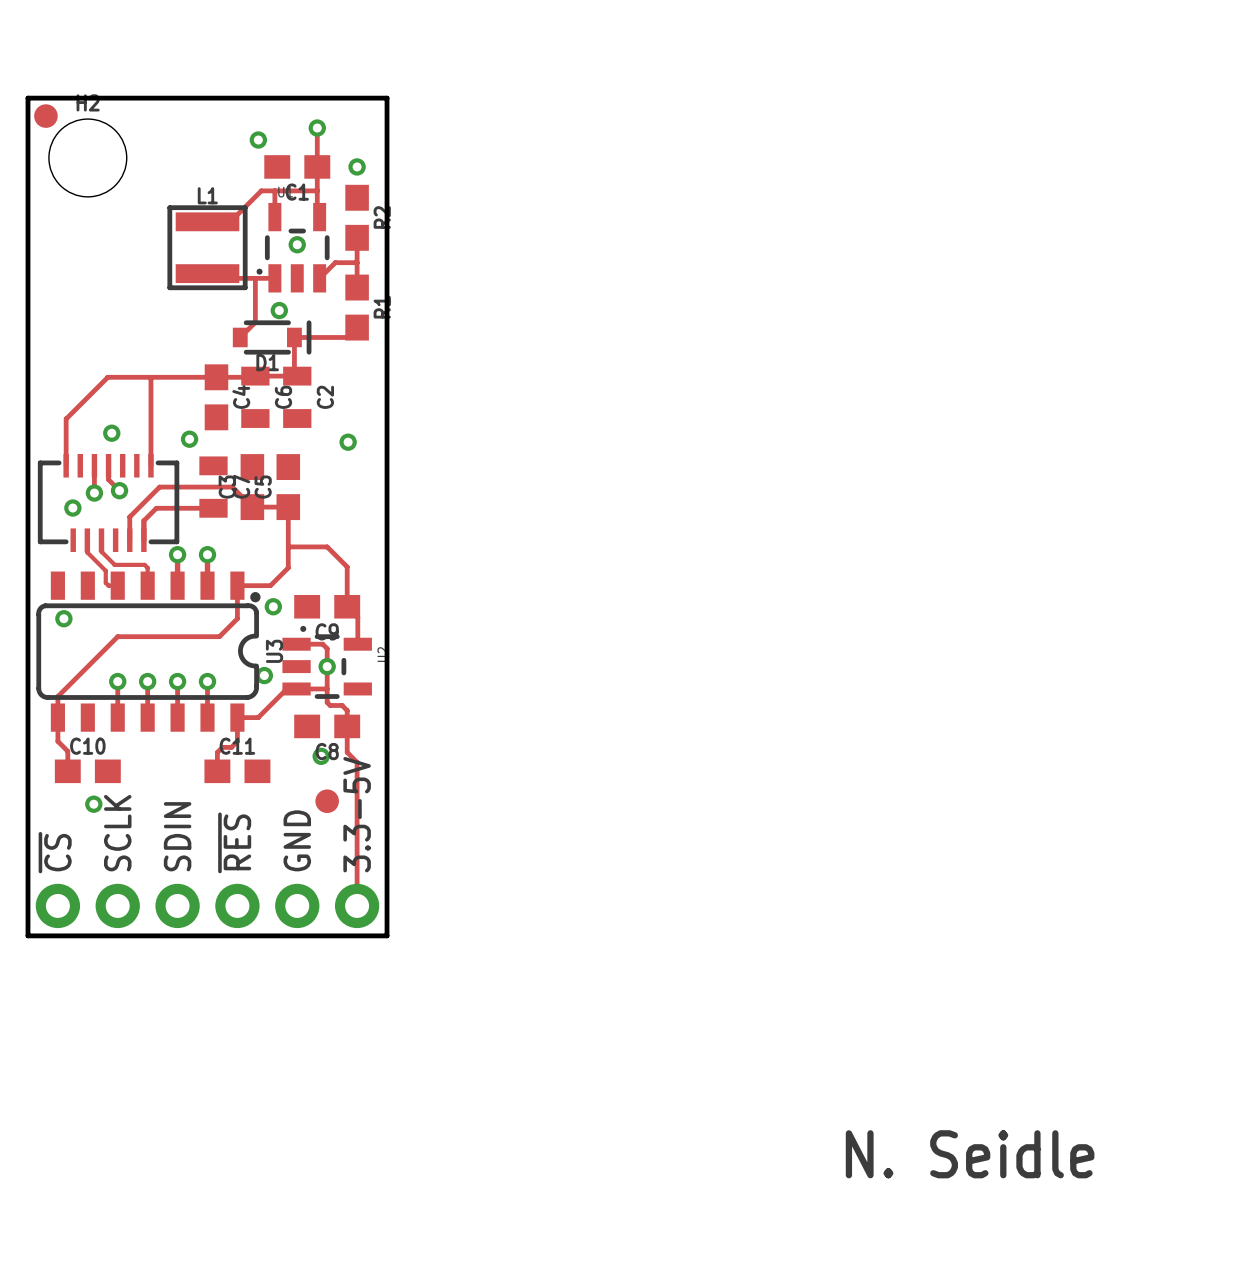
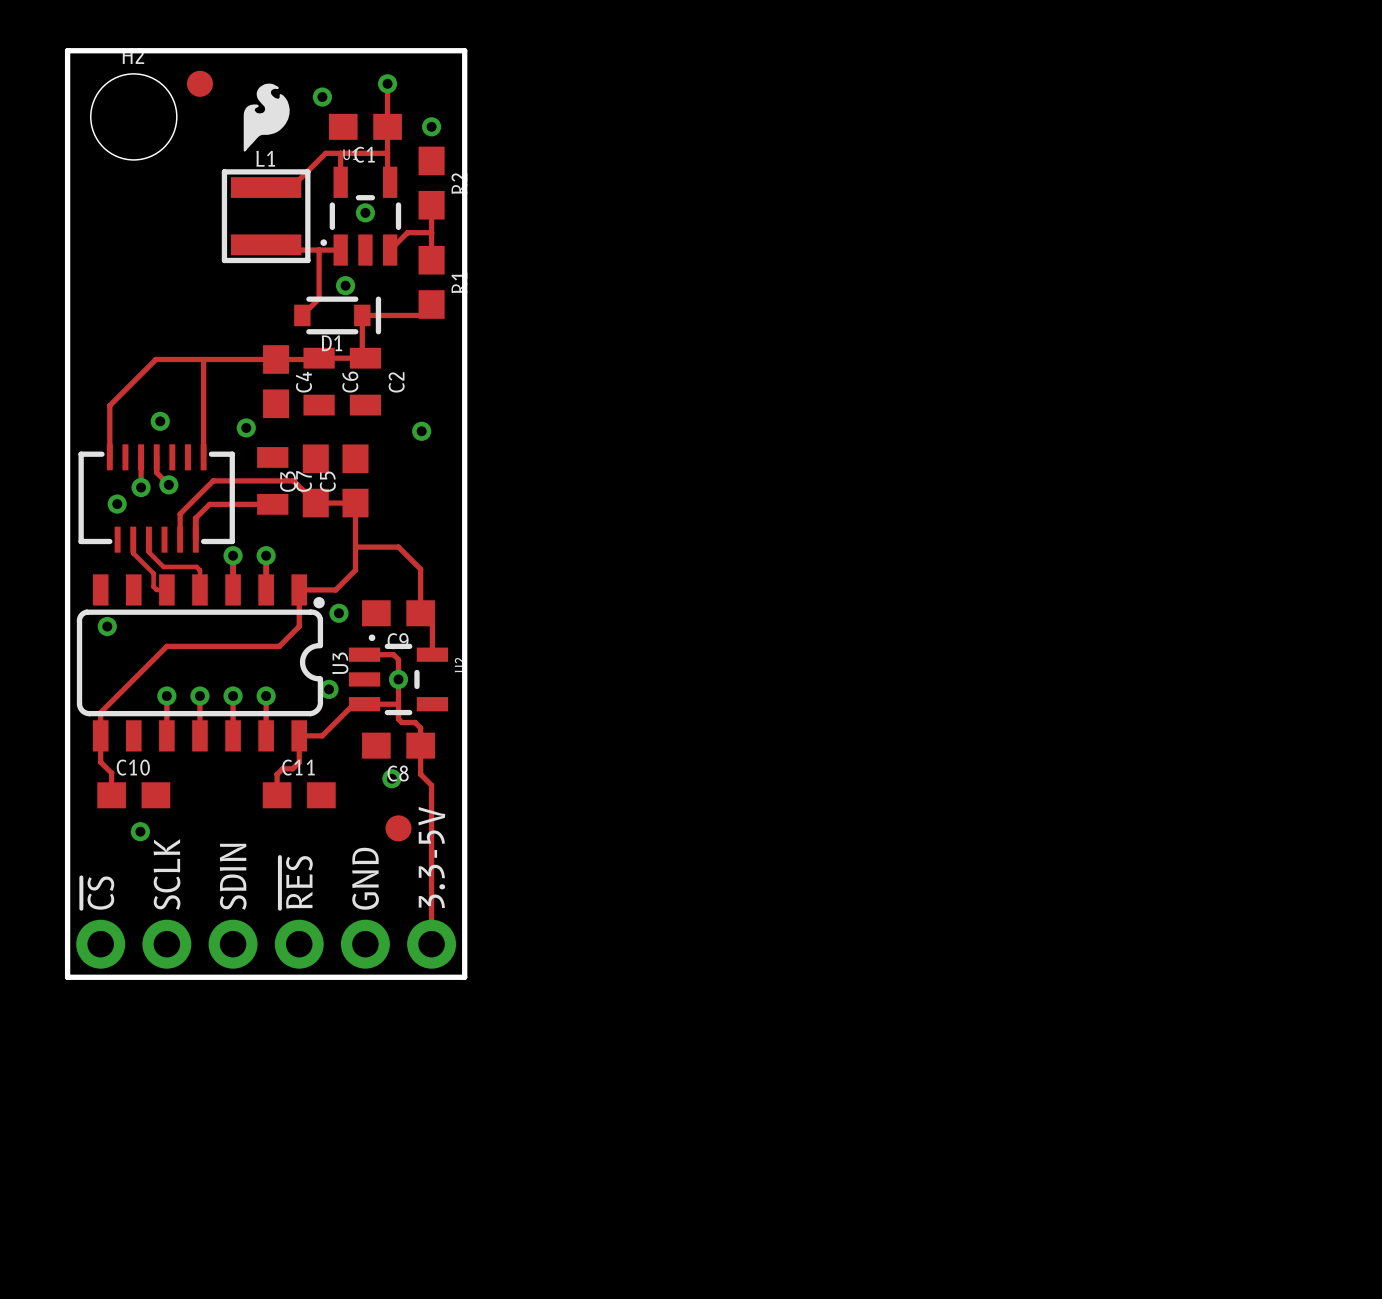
part position: (45, 116) -> (199, 83)
drawing: none -> [243, 83, 290, 152]
text: N. Seidle (970, 1154) -> none

